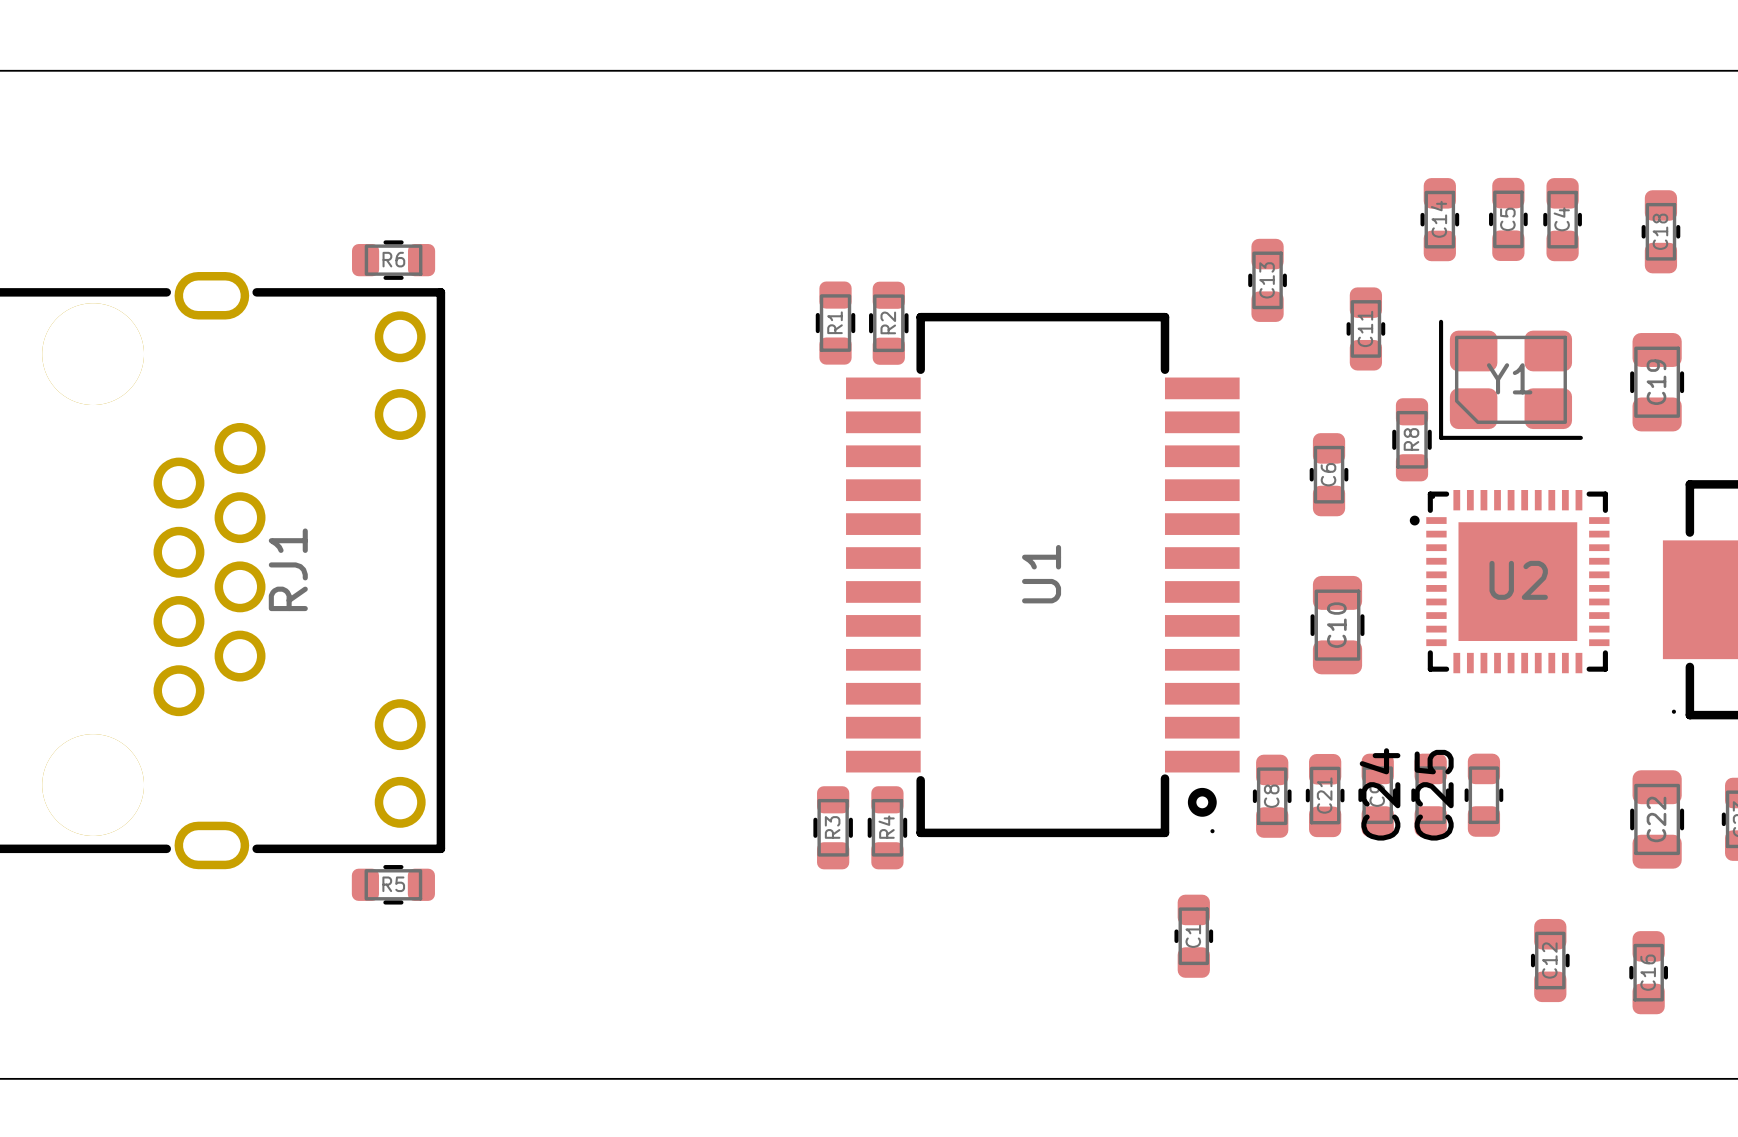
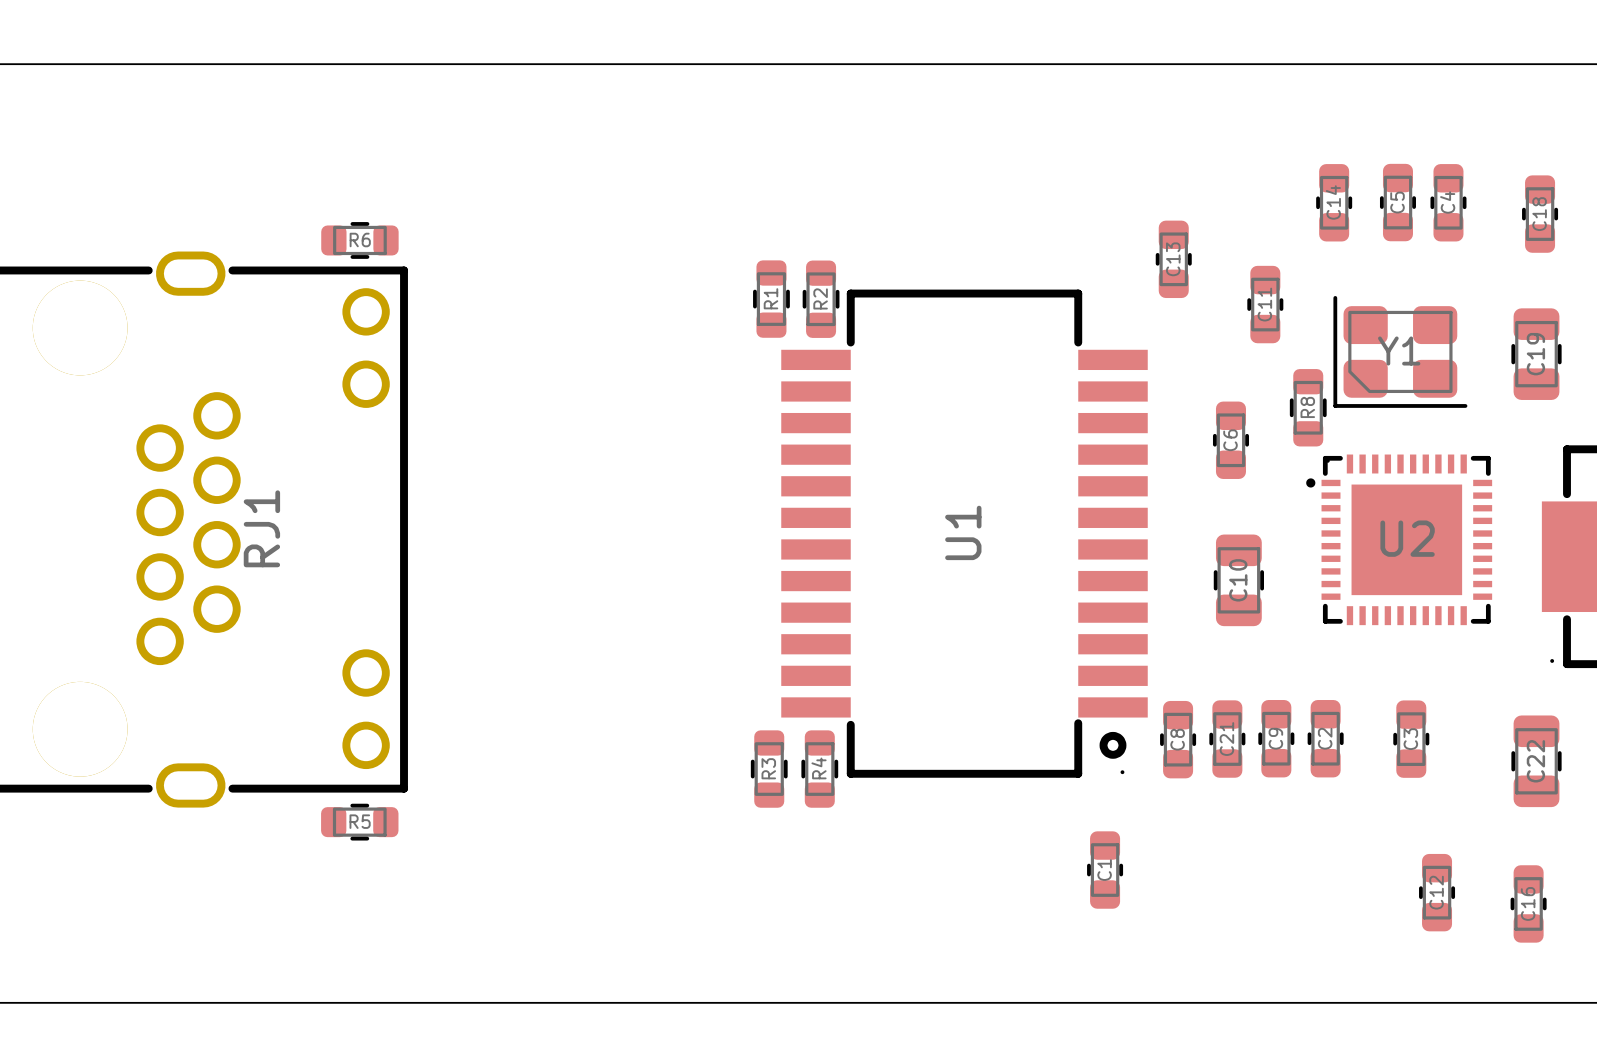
C24 name: C24 (1380, 794) -> C2 (1325, 738)
C25: (1483, 795) -> none
C3: none -> (1411, 739)

